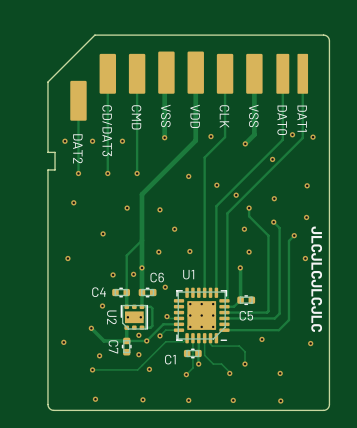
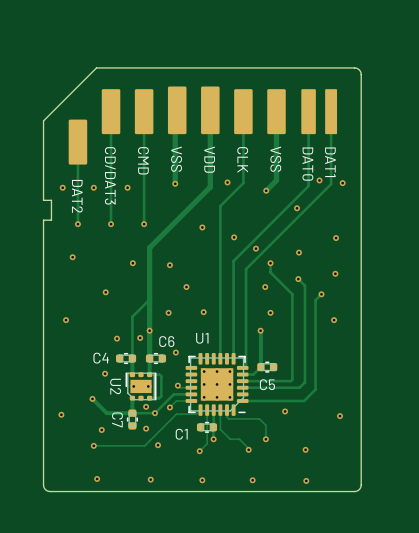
text: JLCJLCJLCJLC (316, 279) -> none

